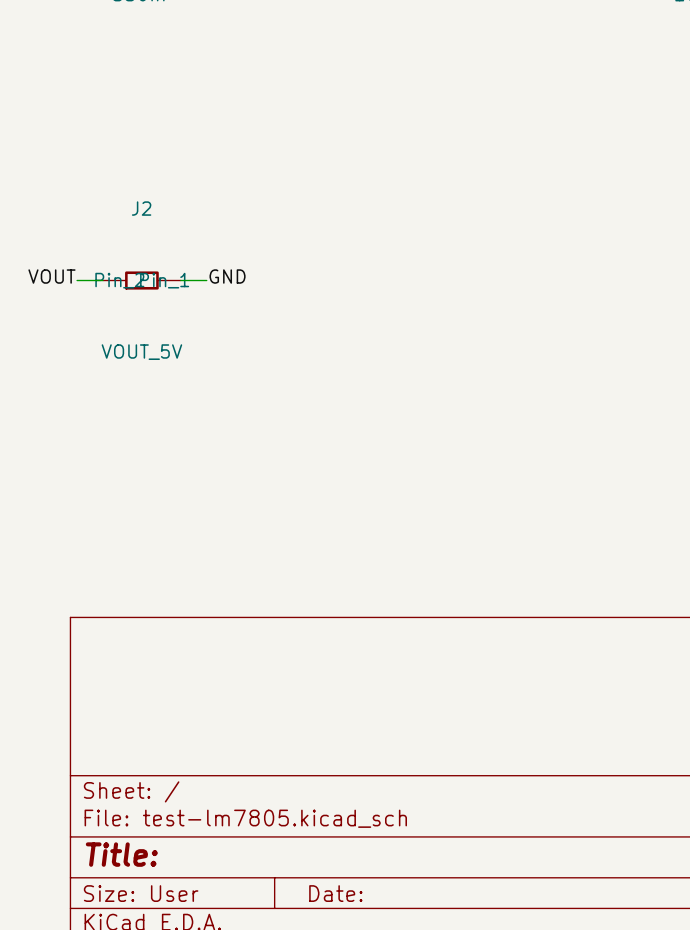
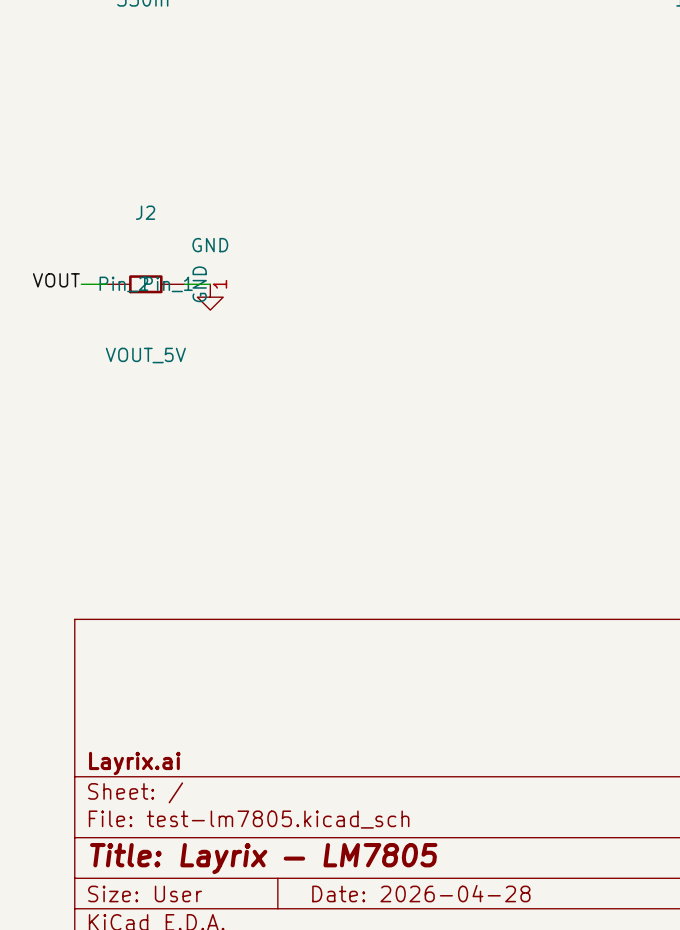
label: GND (227, 276) -> none
power symbol: none -> GND (210, 297)
title block: none -> Layrix.ai (134, 763)
title block: Title: (121, 854) -> Title: Layrix — LM7805 (263, 858)
title block: Date: (335, 893) -> Date: 2026-04-28 (421, 893)

